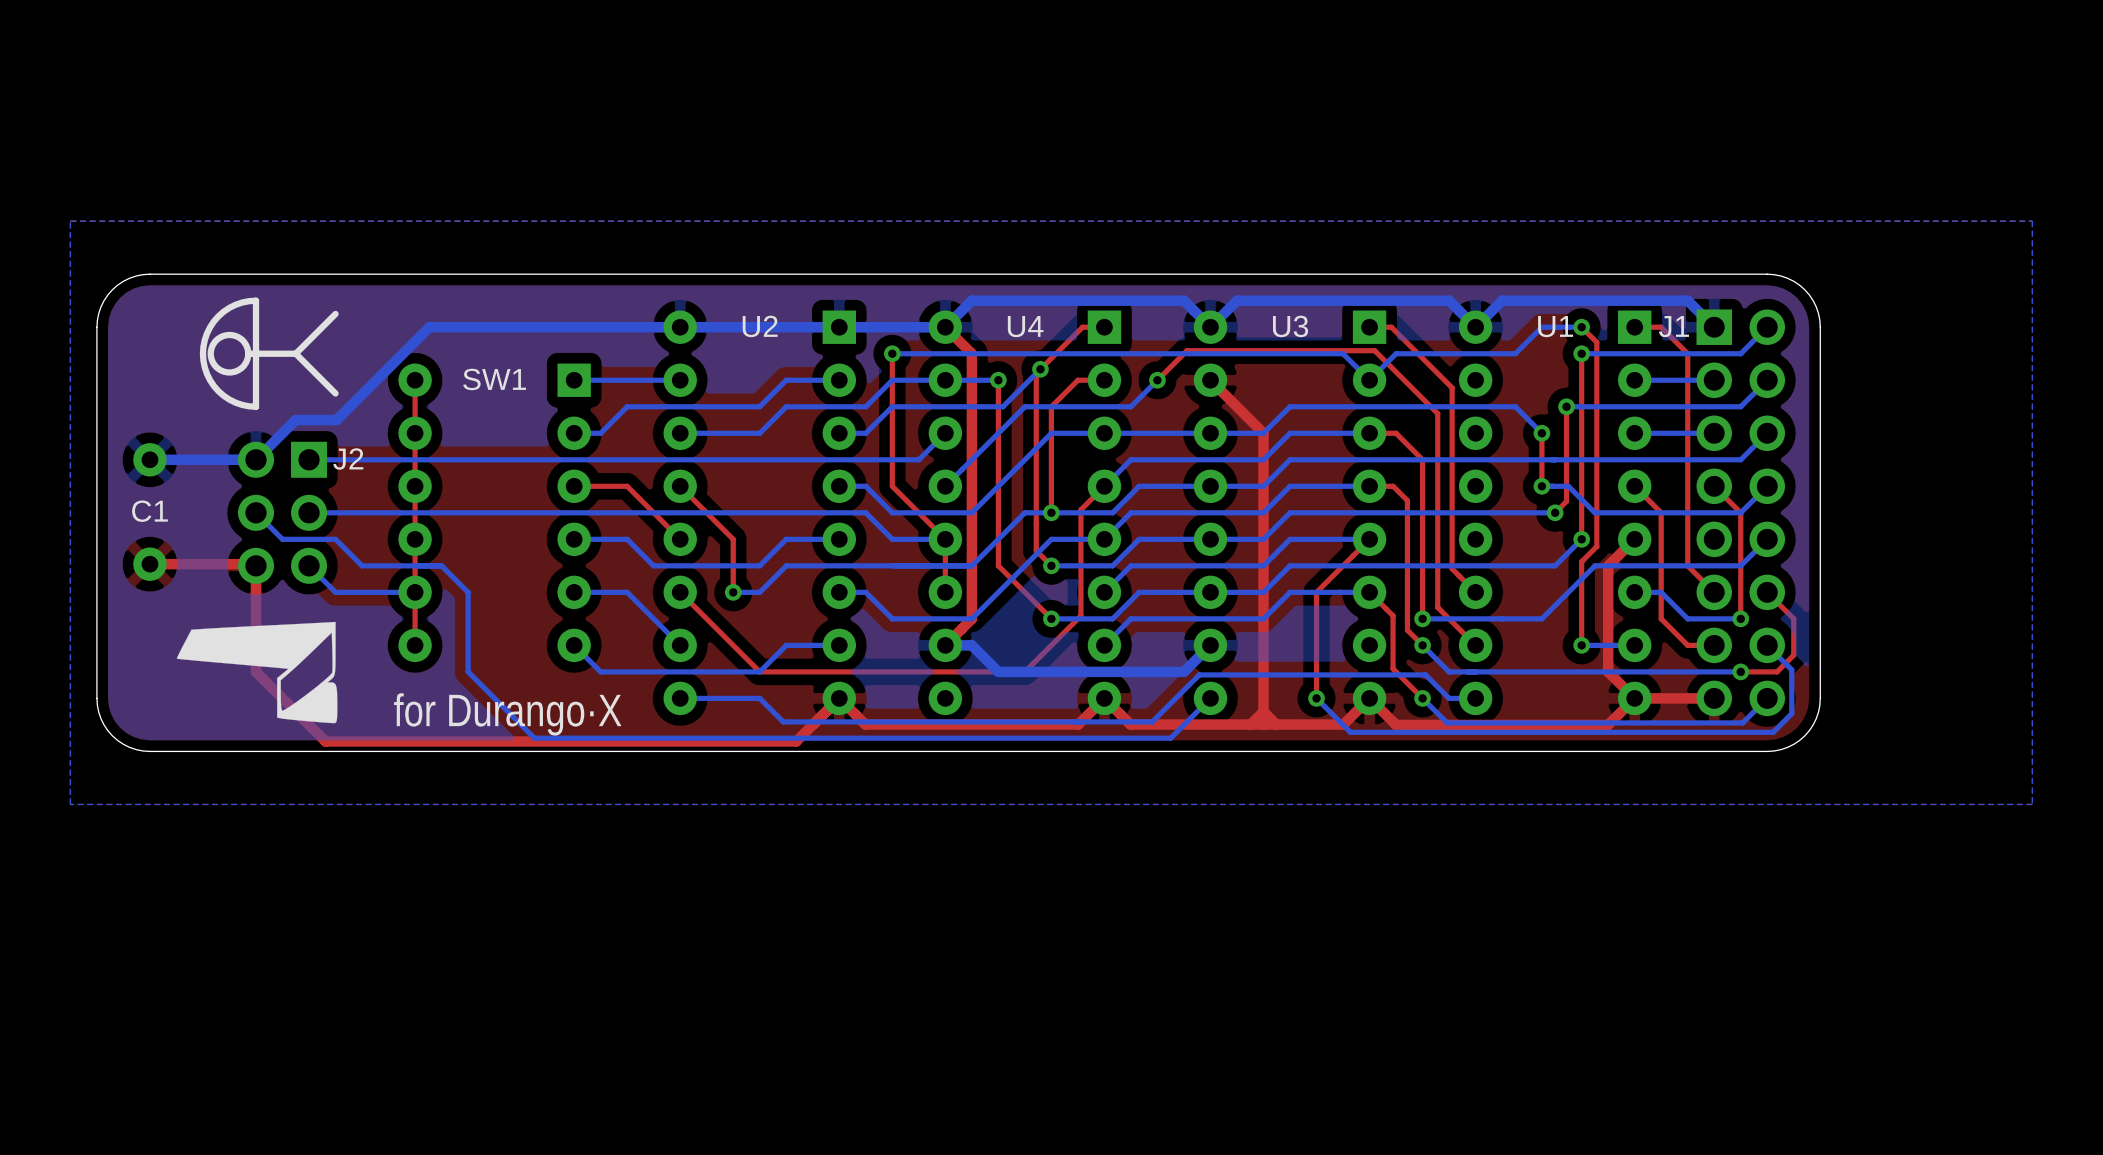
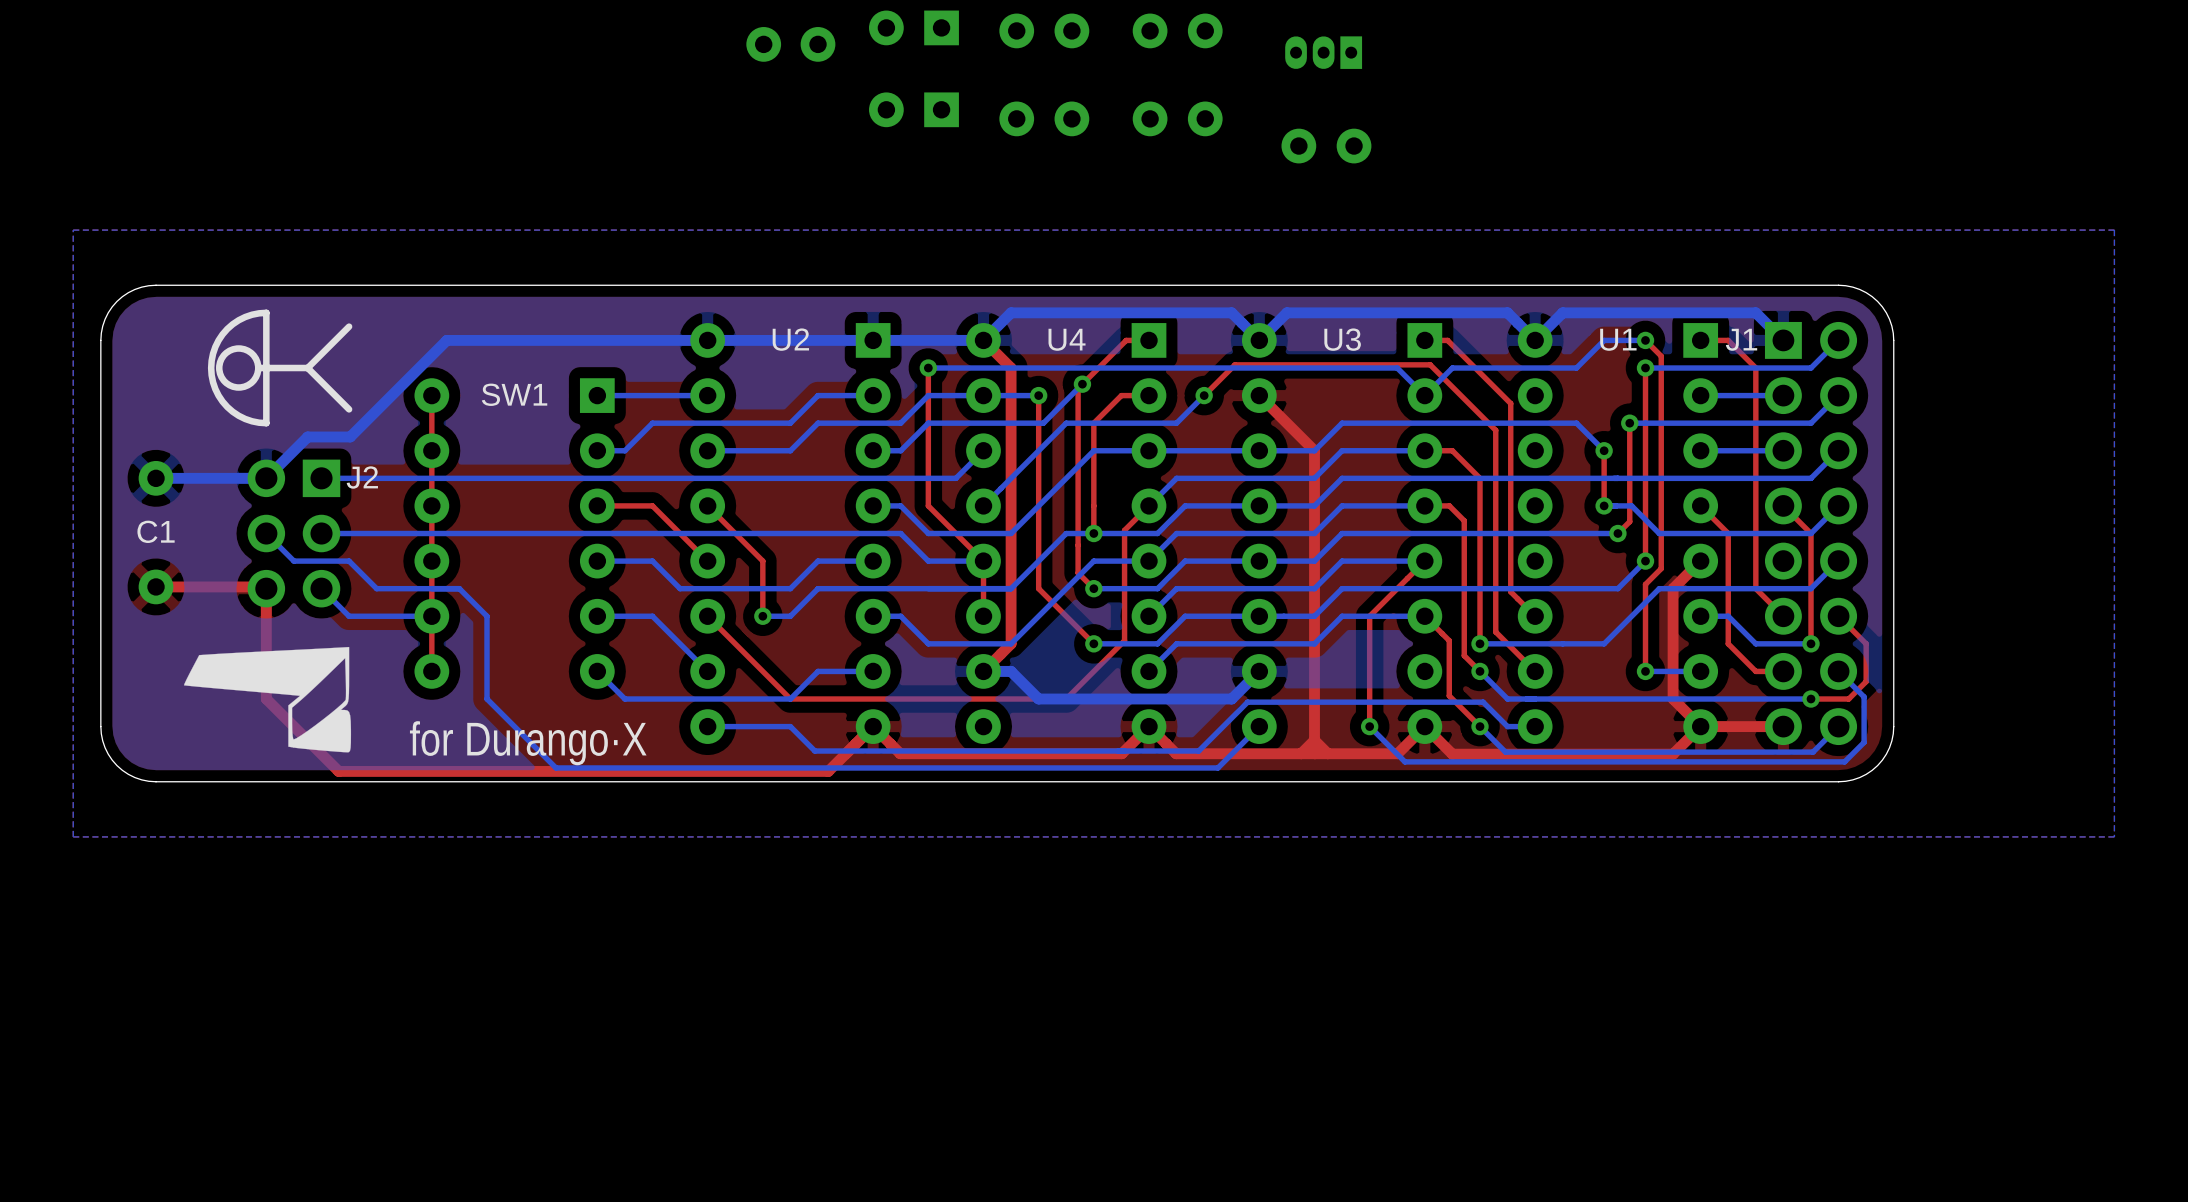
part: none -> (913, 27)
part: none -> (1044, 30)
part: none -> (1177, 30)
part: none -> (790, 44)
part: none -> (1323, 52)
part: none -> (913, 109)
part: none -> (1044, 118)
part: none -> (1177, 118)
part: none -> (1326, 146)

